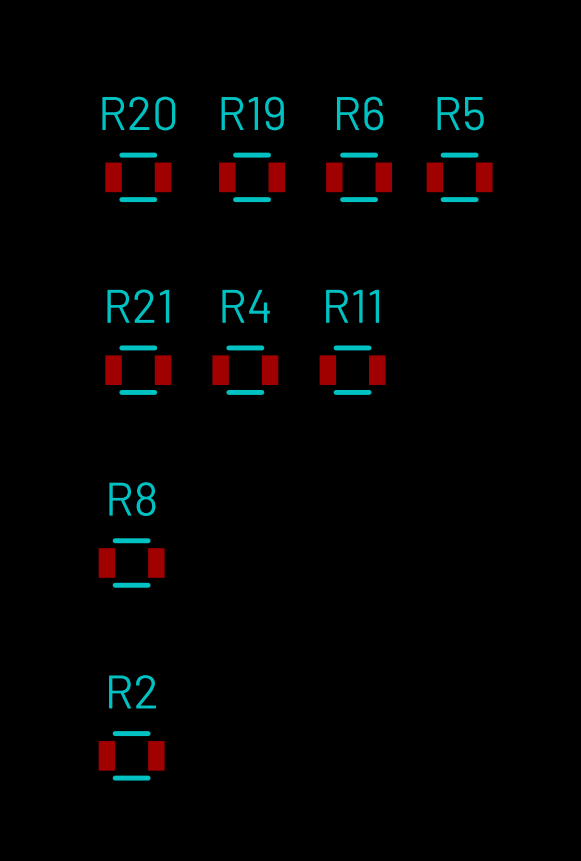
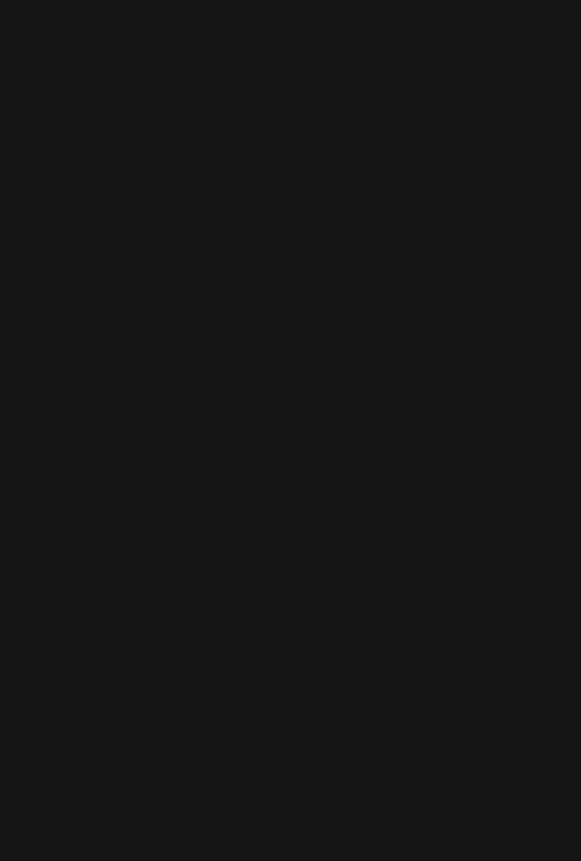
R20: (138, 177) -> none
R19: (252, 177) -> none
R6: (359, 177) -> none
R5: (459, 177) -> none
R21: (138, 370) -> none
R4: (245, 370) -> none
R11: (352, 370) -> none
R8: (131, 563) -> none
R2: (131, 755) -> none

